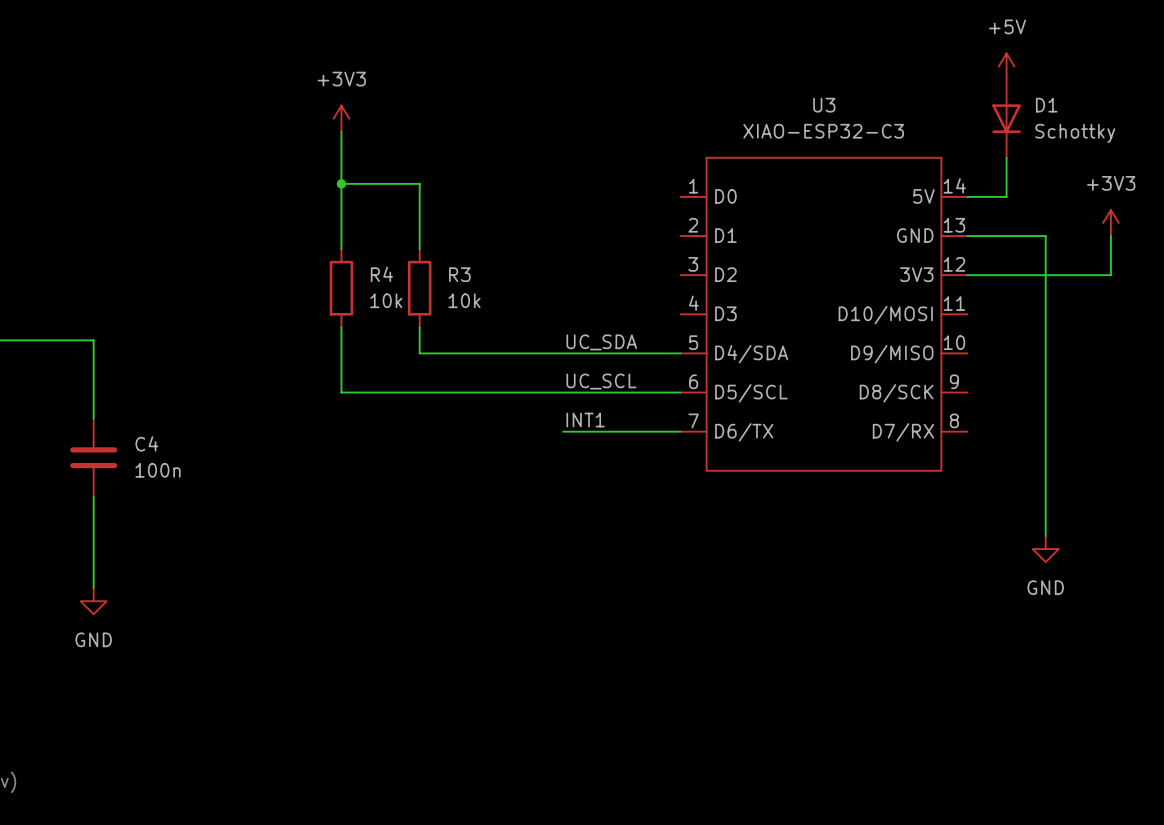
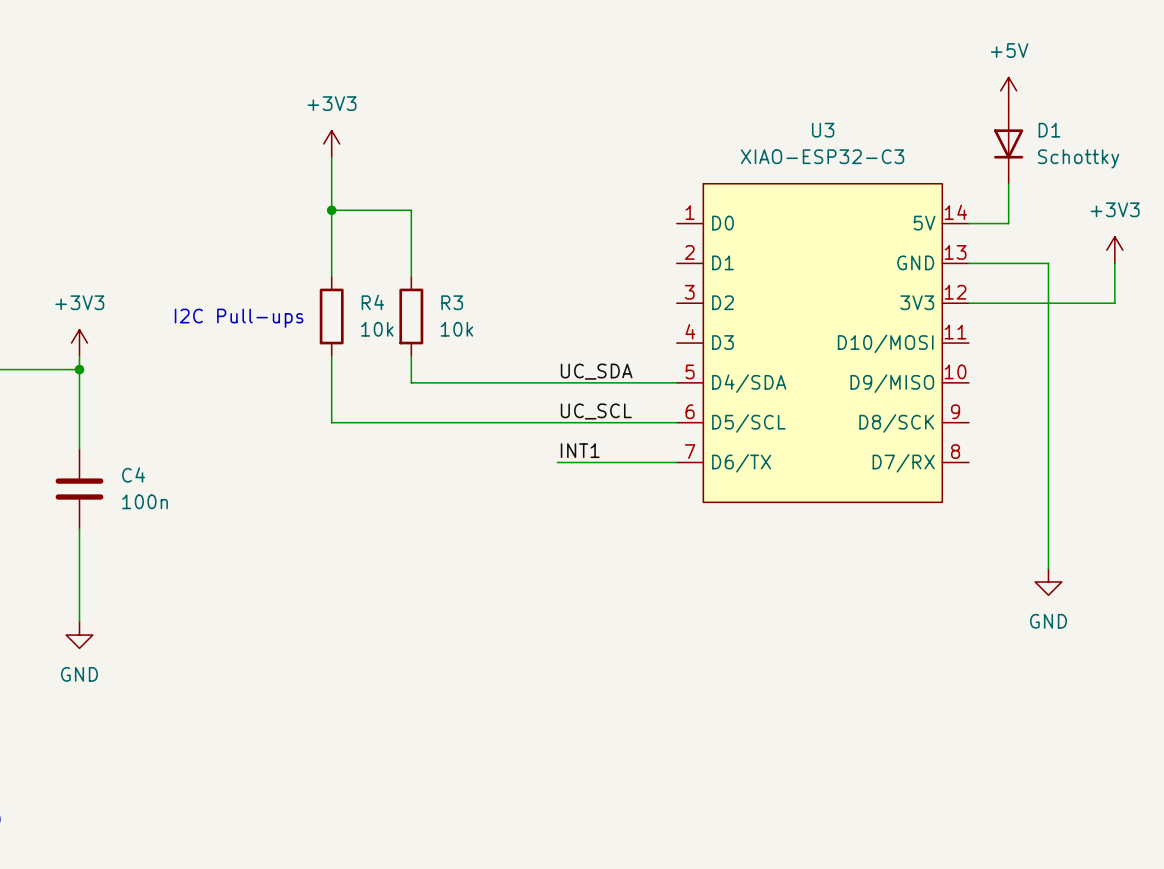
text: none -> I2C Pull-ups (239, 318)
power symbol: none -> +3V3 (79, 343)
wire: none -> (79, 356) (79, 369)
junction: none -> (79, 369)

